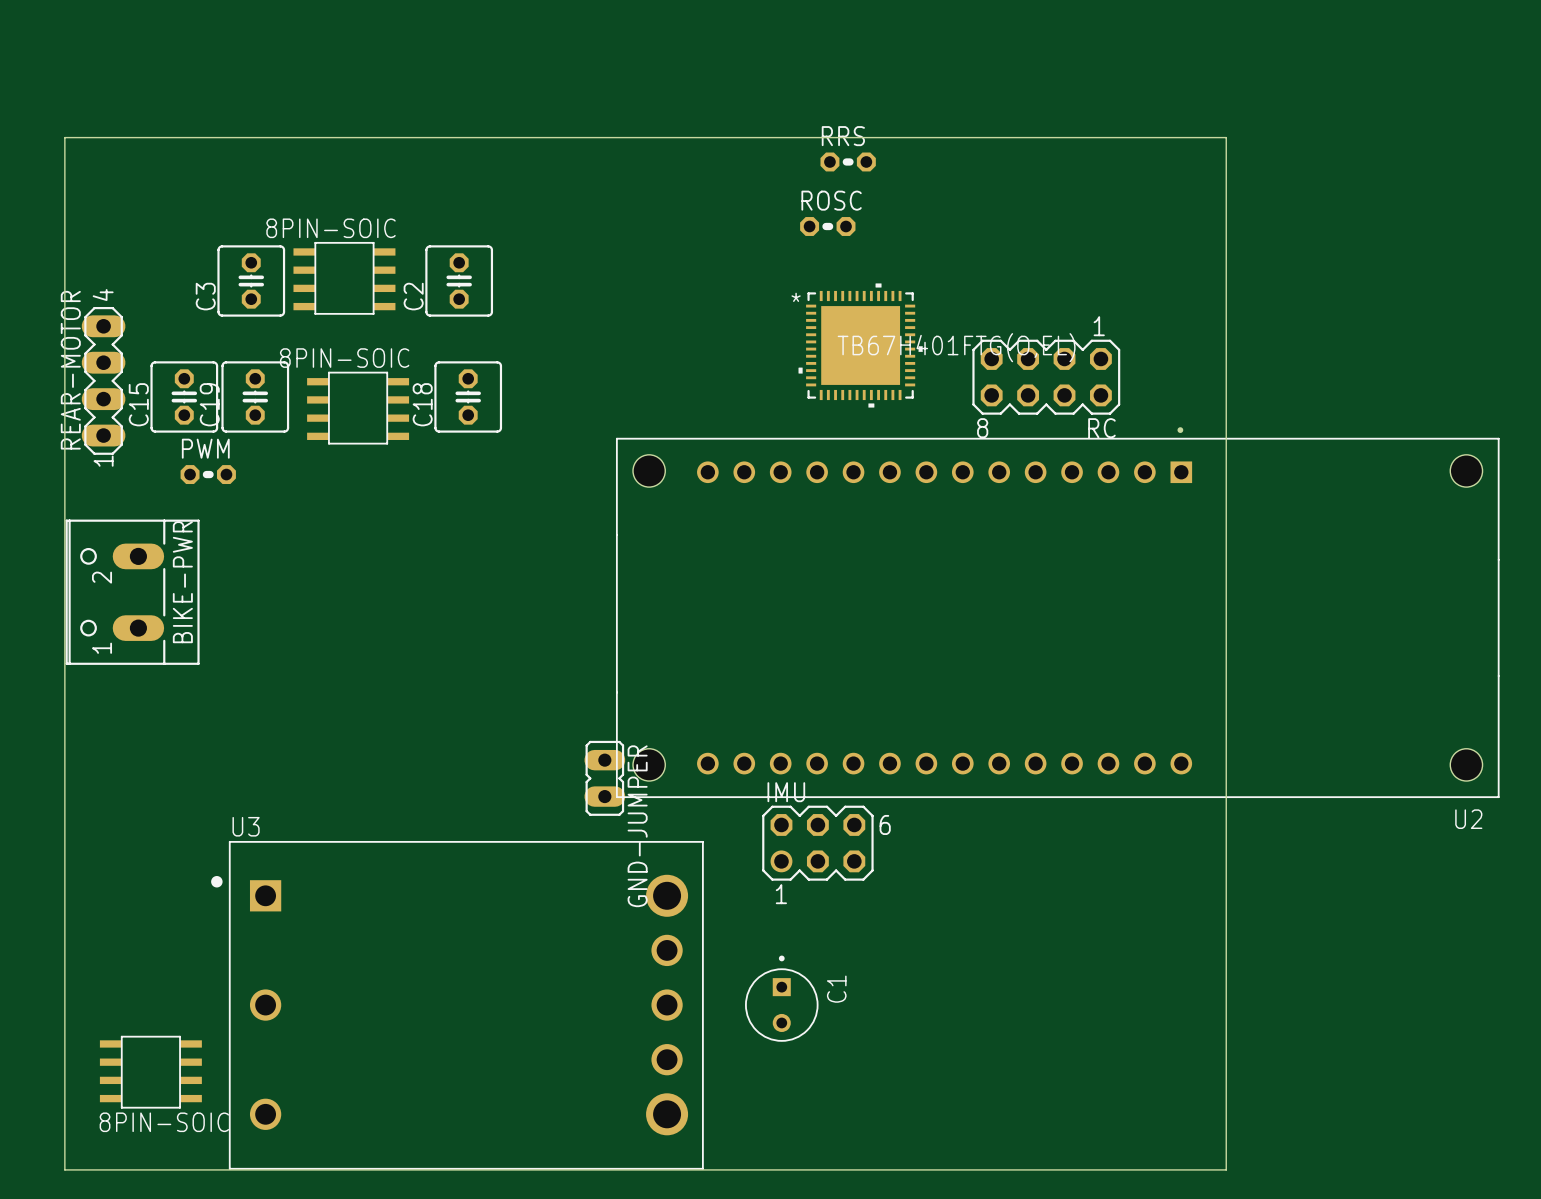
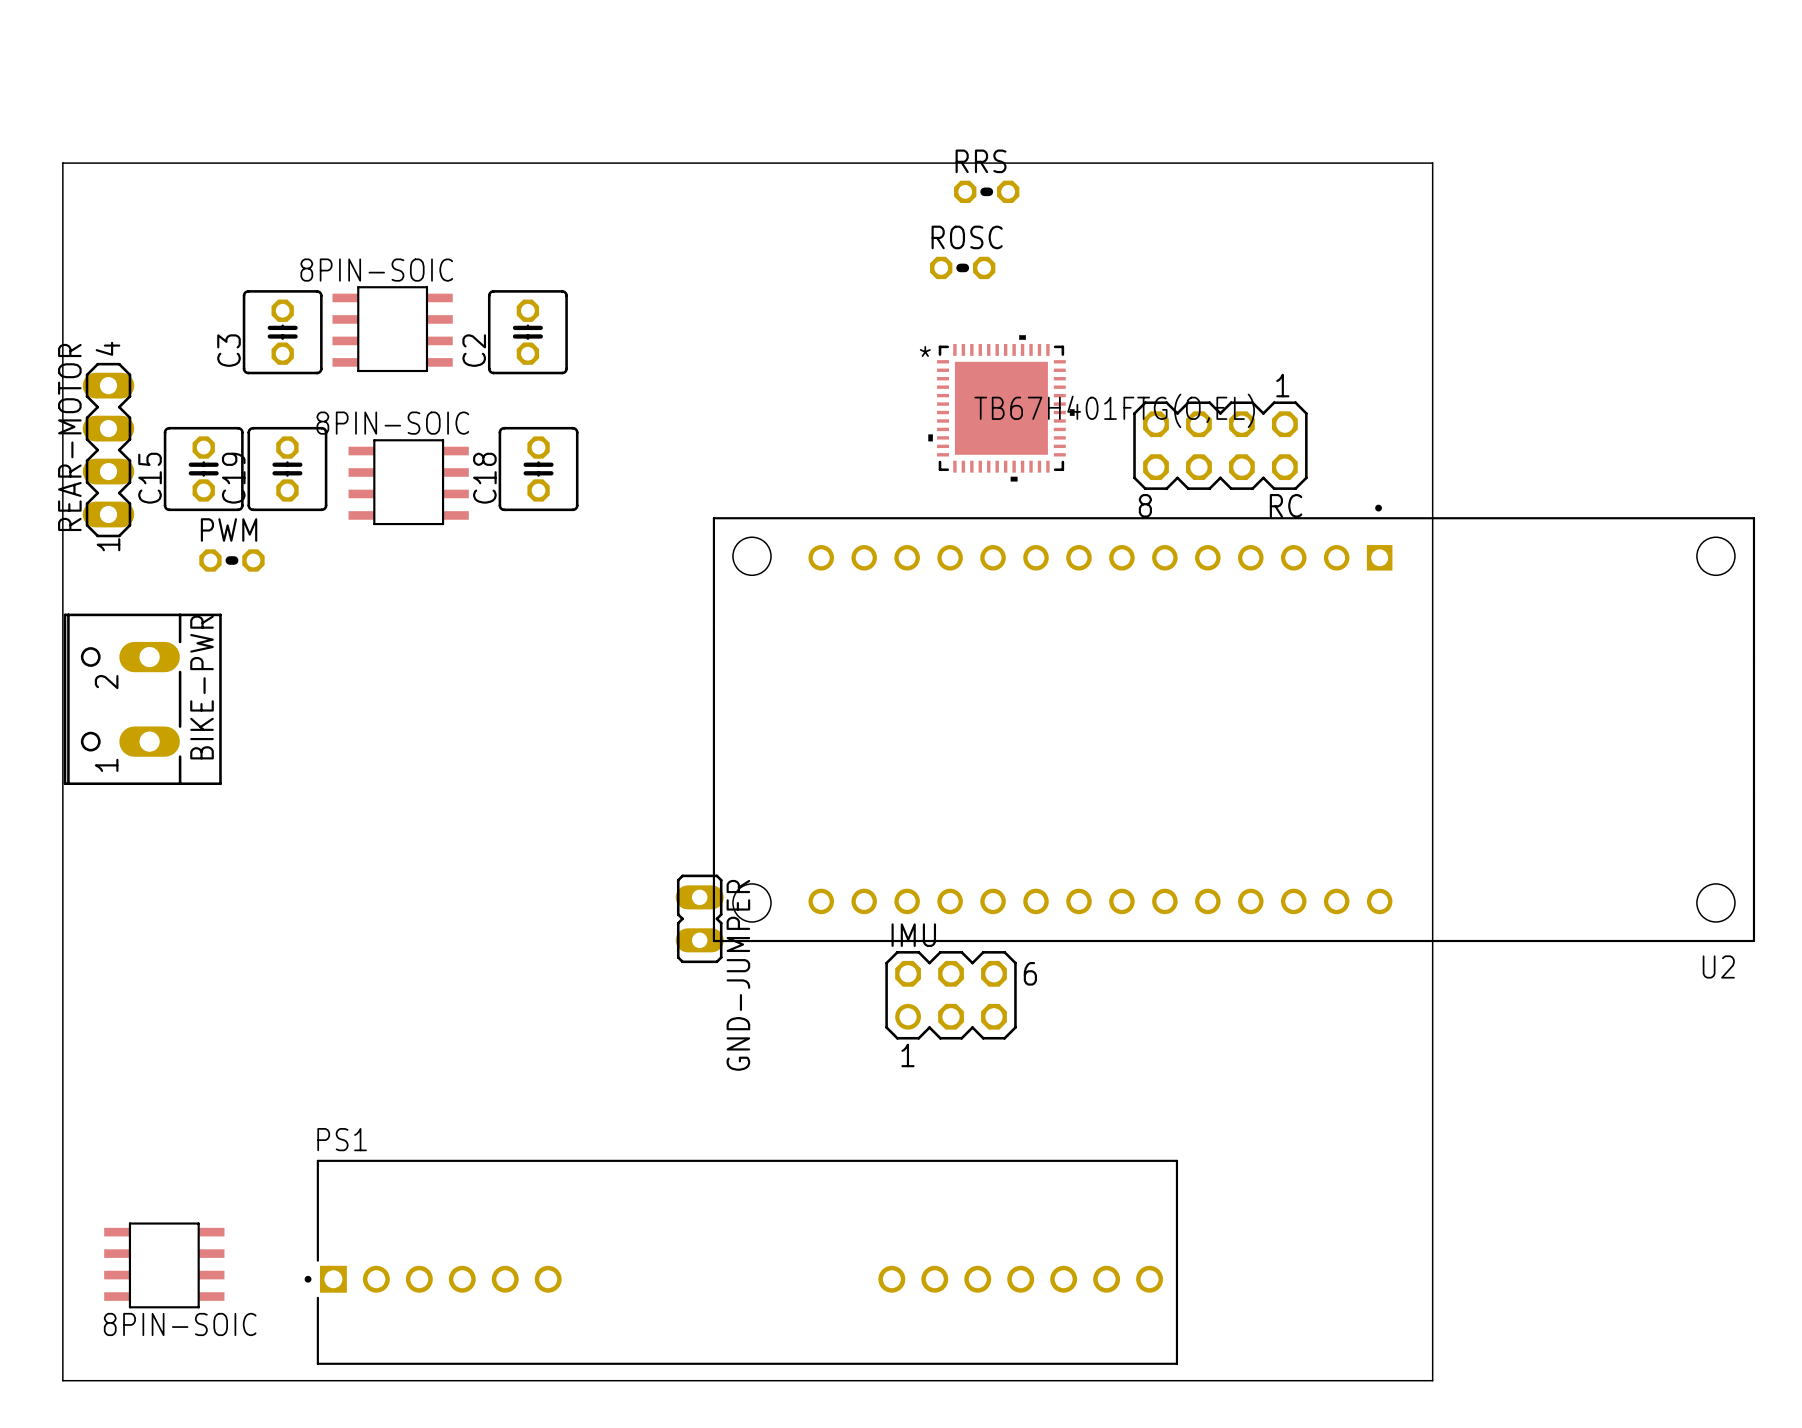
C1: (781, 998) -> none
U3: (457, 1005) -> none
PS1: none -> (741, 1262)

